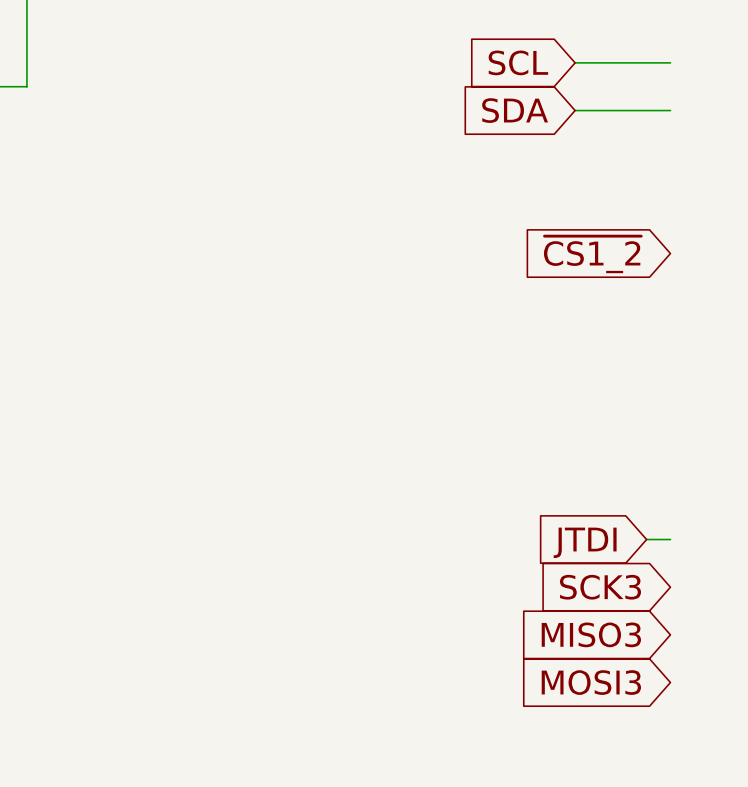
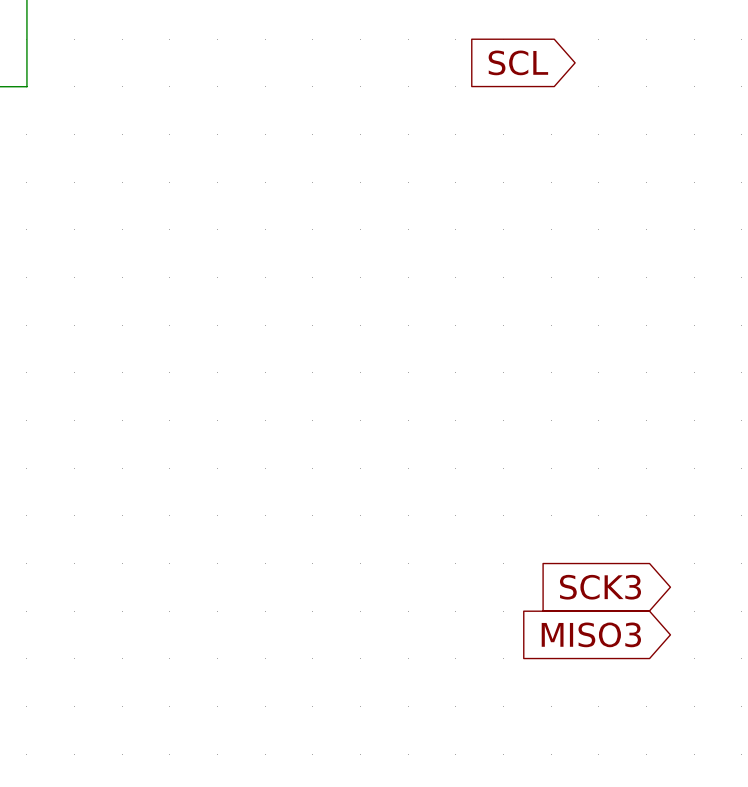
wire: (575, 62) (670, 62) -> none
global label: SDA (515, 110) -> none
wire: (575, 110) (670, 110) -> none
global label: ~{CS1_2} (592, 254) -> none
wire: (646, 539) (670, 539) -> none
global label: JTDI (585, 542) -> none
global label: MOSI3 (591, 682) -> none

